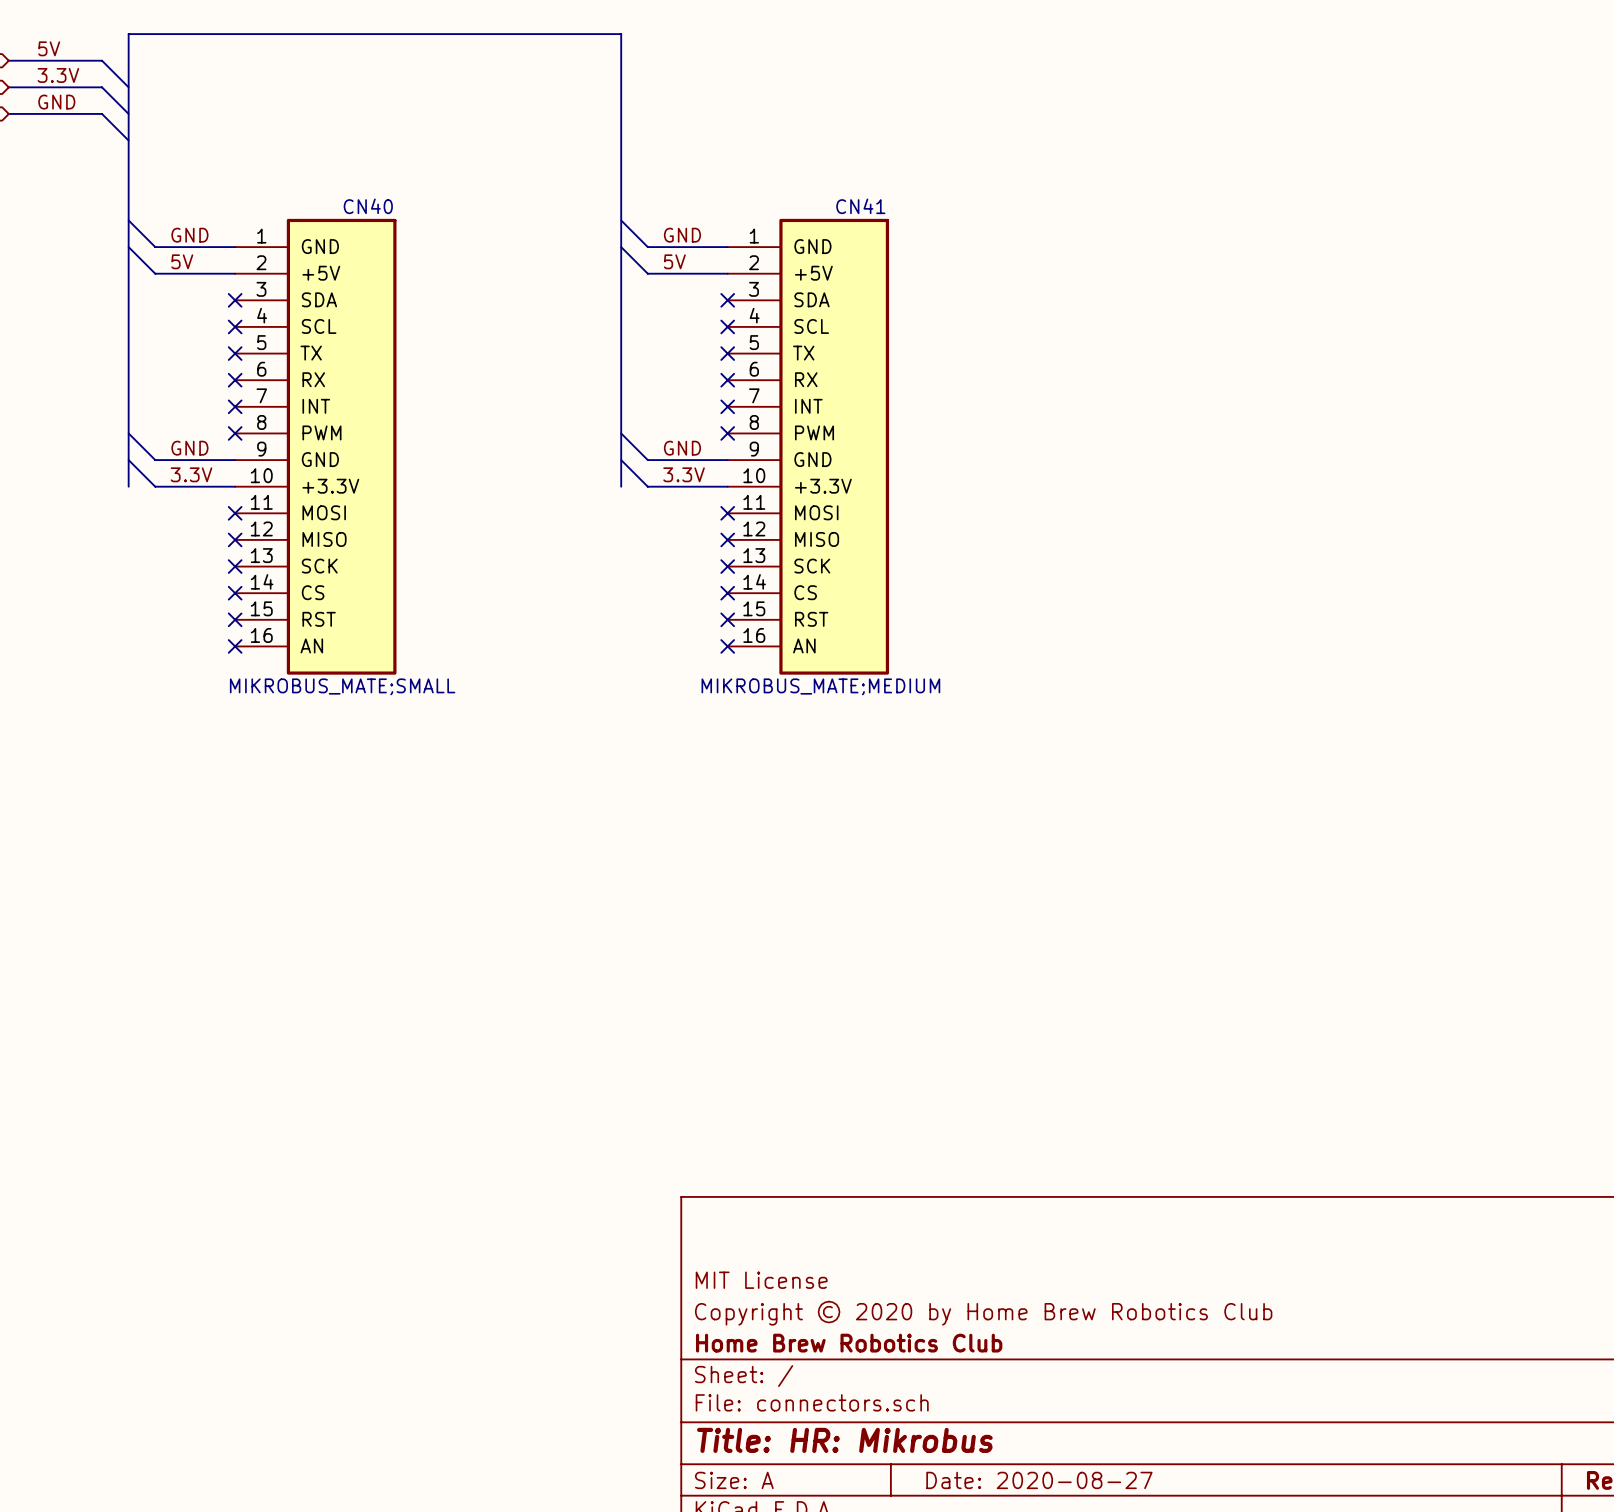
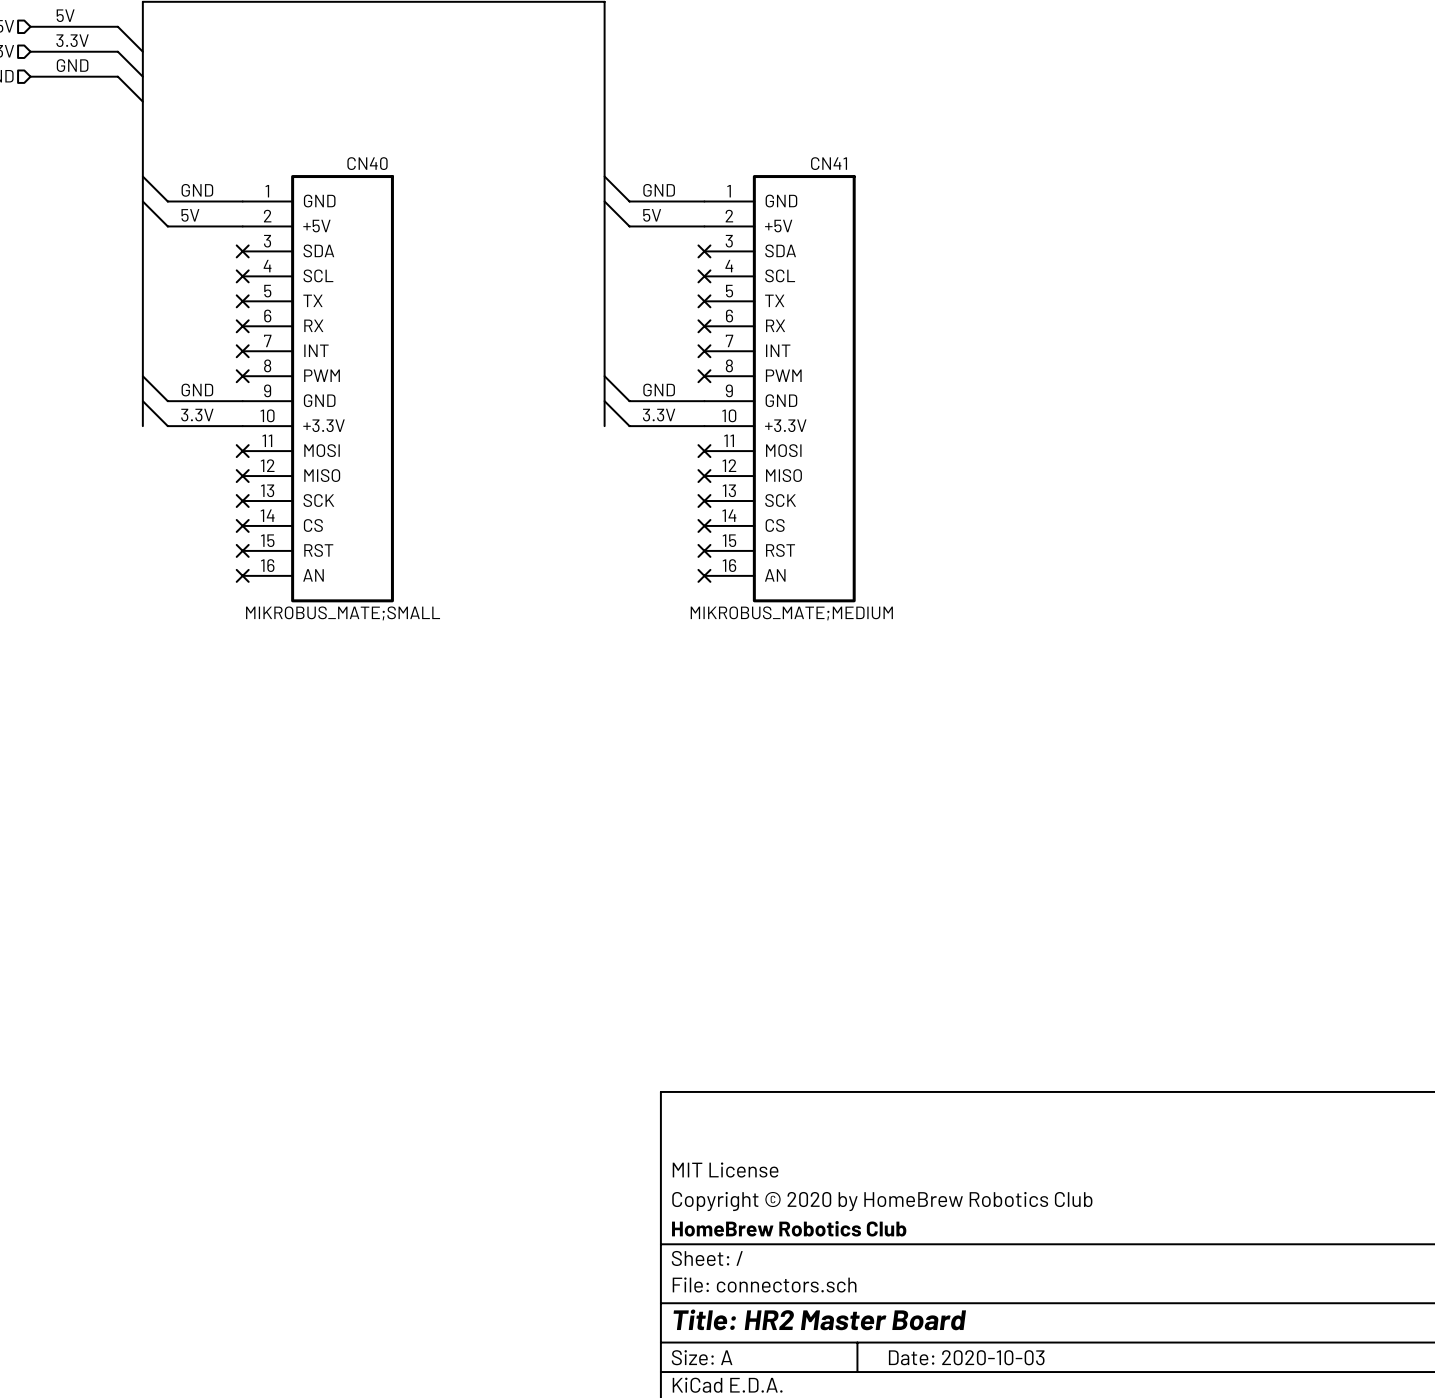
title block: Copyright © 2020 by Home Brew Robotics Club (983, 1313) -> Copyright © 2020 by HomeBrew Robotics Club (882, 1201)
title block: Home Brew Robotics Club (849, 1343) -> HomeBrew Robotics Club (789, 1228)
title block: Title: HR: Mikrobus (844, 1440) -> Title: HR2 Master Board (819, 1319)
title block: Date: 2020-08-27 (1039, 1480) -> Date: 2020-10-03 (966, 1357)

